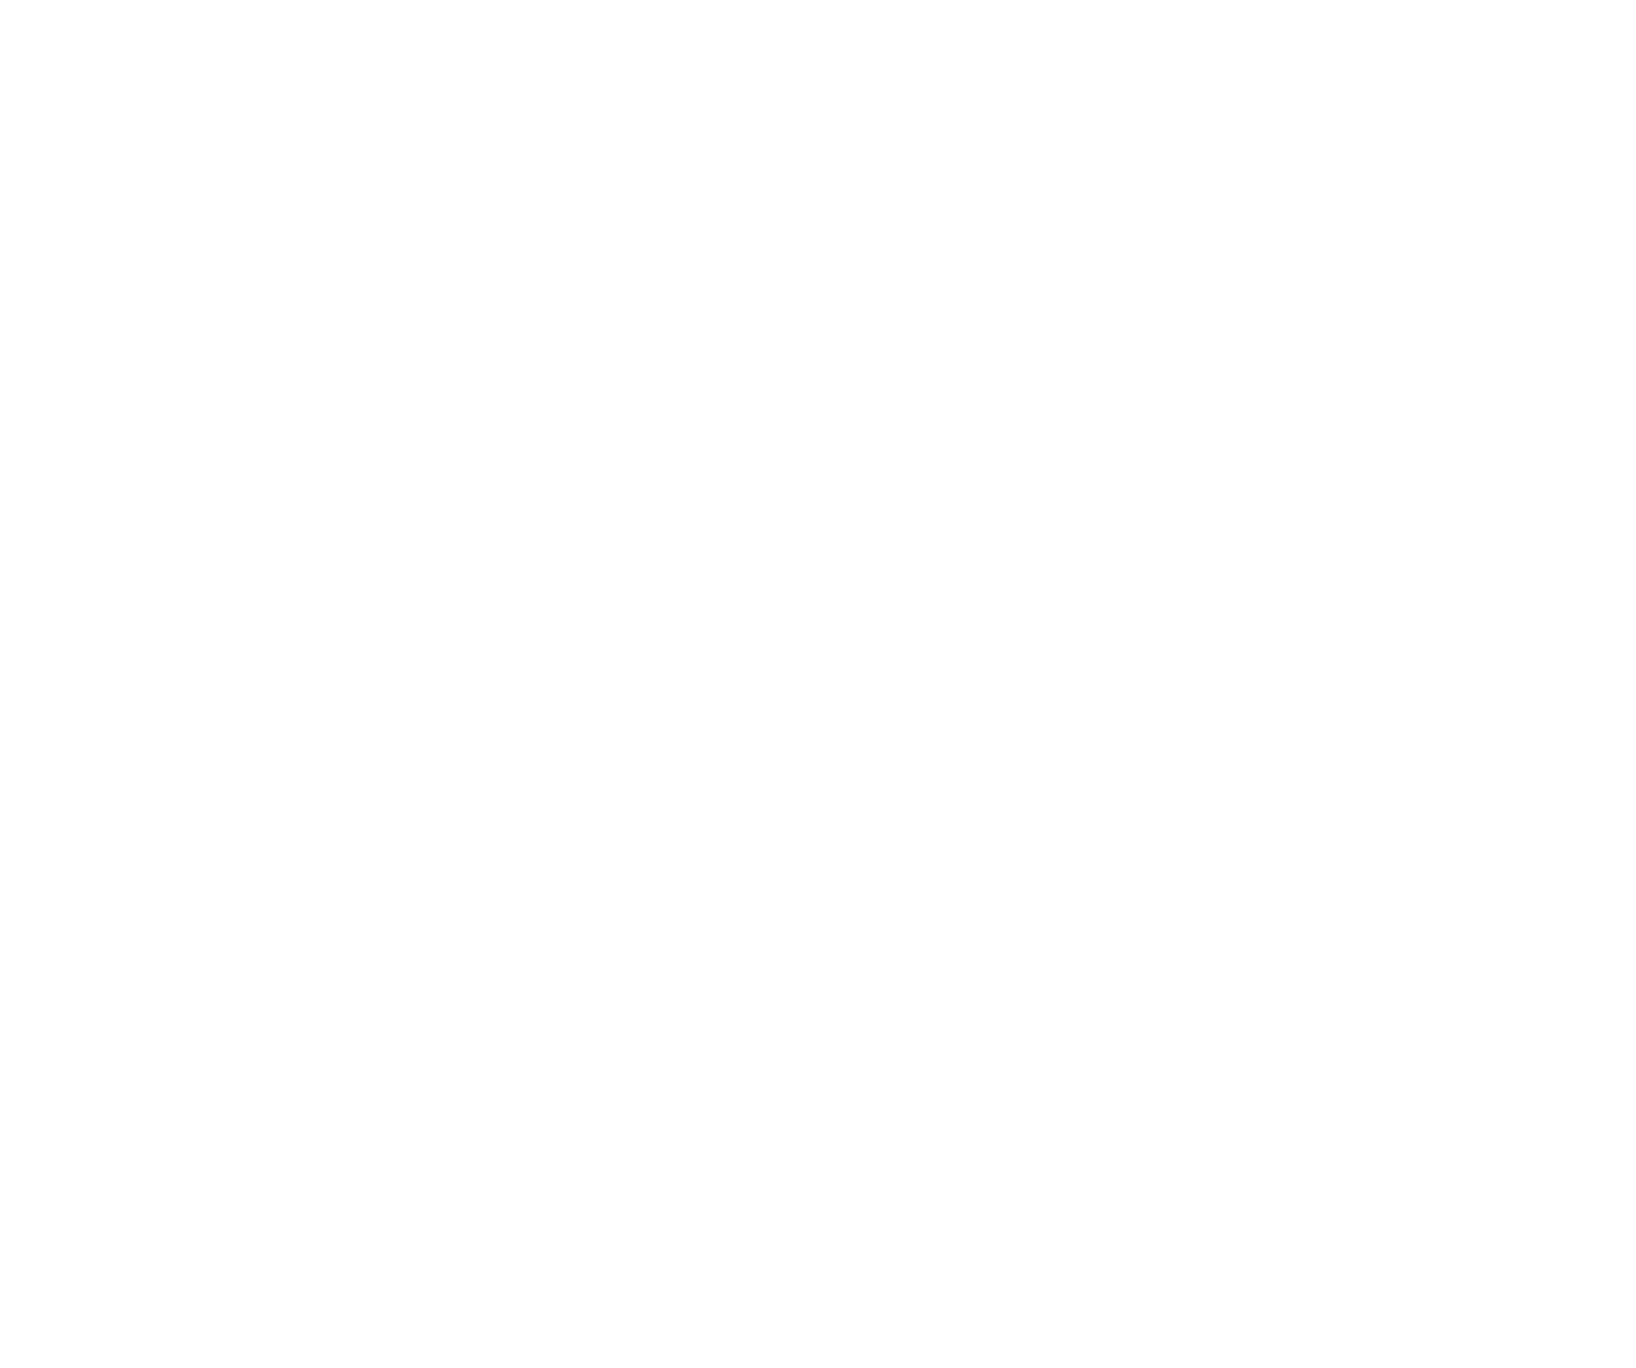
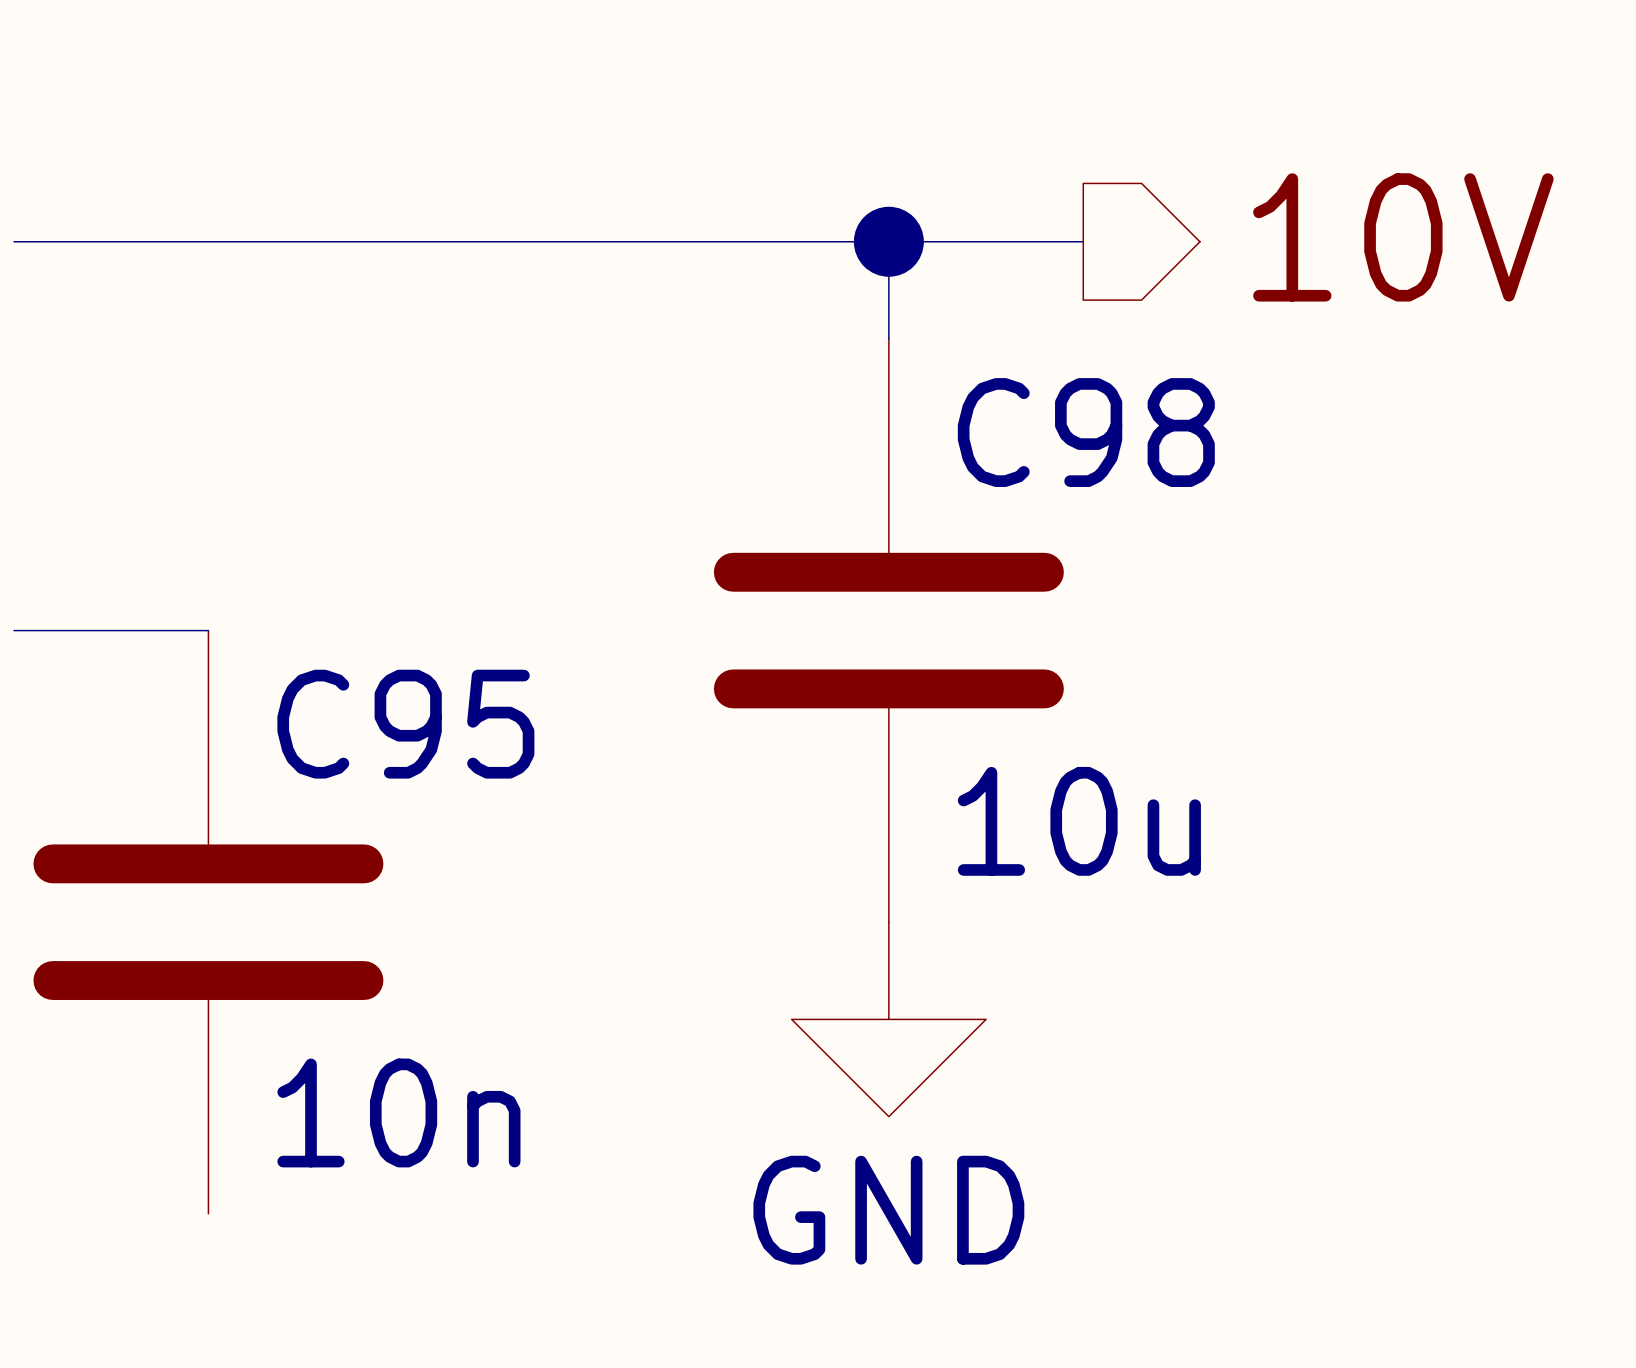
hierarchical label: none -> 10V (1403, 237)
wire: none -> (14, 241) (1083, 241)
wire: none -> (888, 241) (888, 338)
junction: none -> (888, 241)
wire: none -> (14, 630) (208, 630)
C98: none -> 10u (888, 630)
C95: none -> 10n (208, 922)
power symbol: none -> GND (888, 1019)

